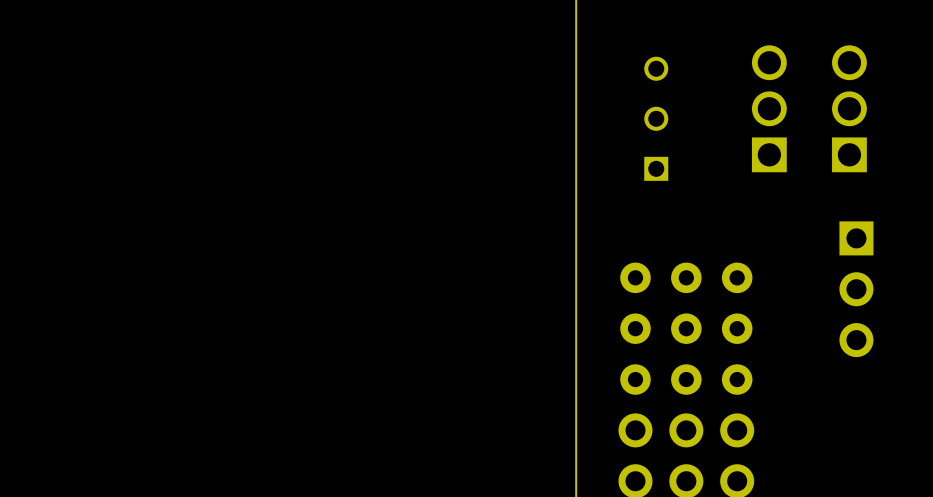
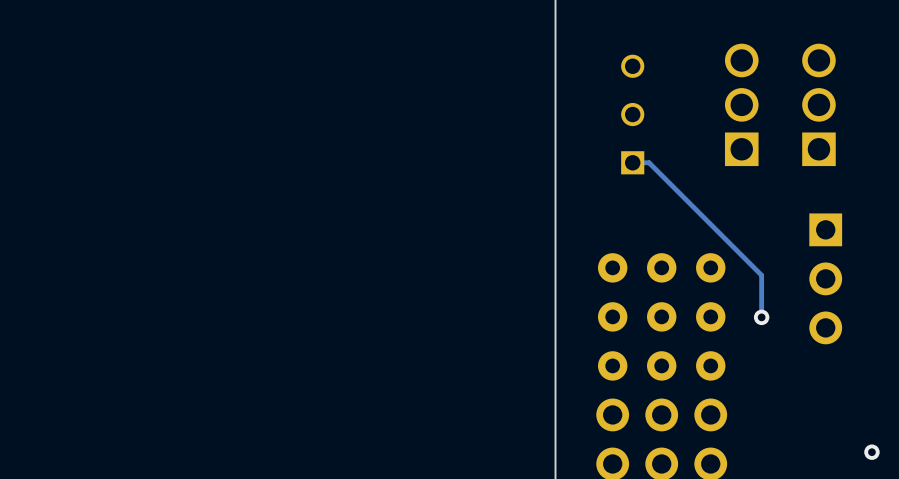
track: none -> (632, 162) (649, 162) (761, 275) (761, 317)
via: none -> (761, 317)
via: none -> (871, 452)

